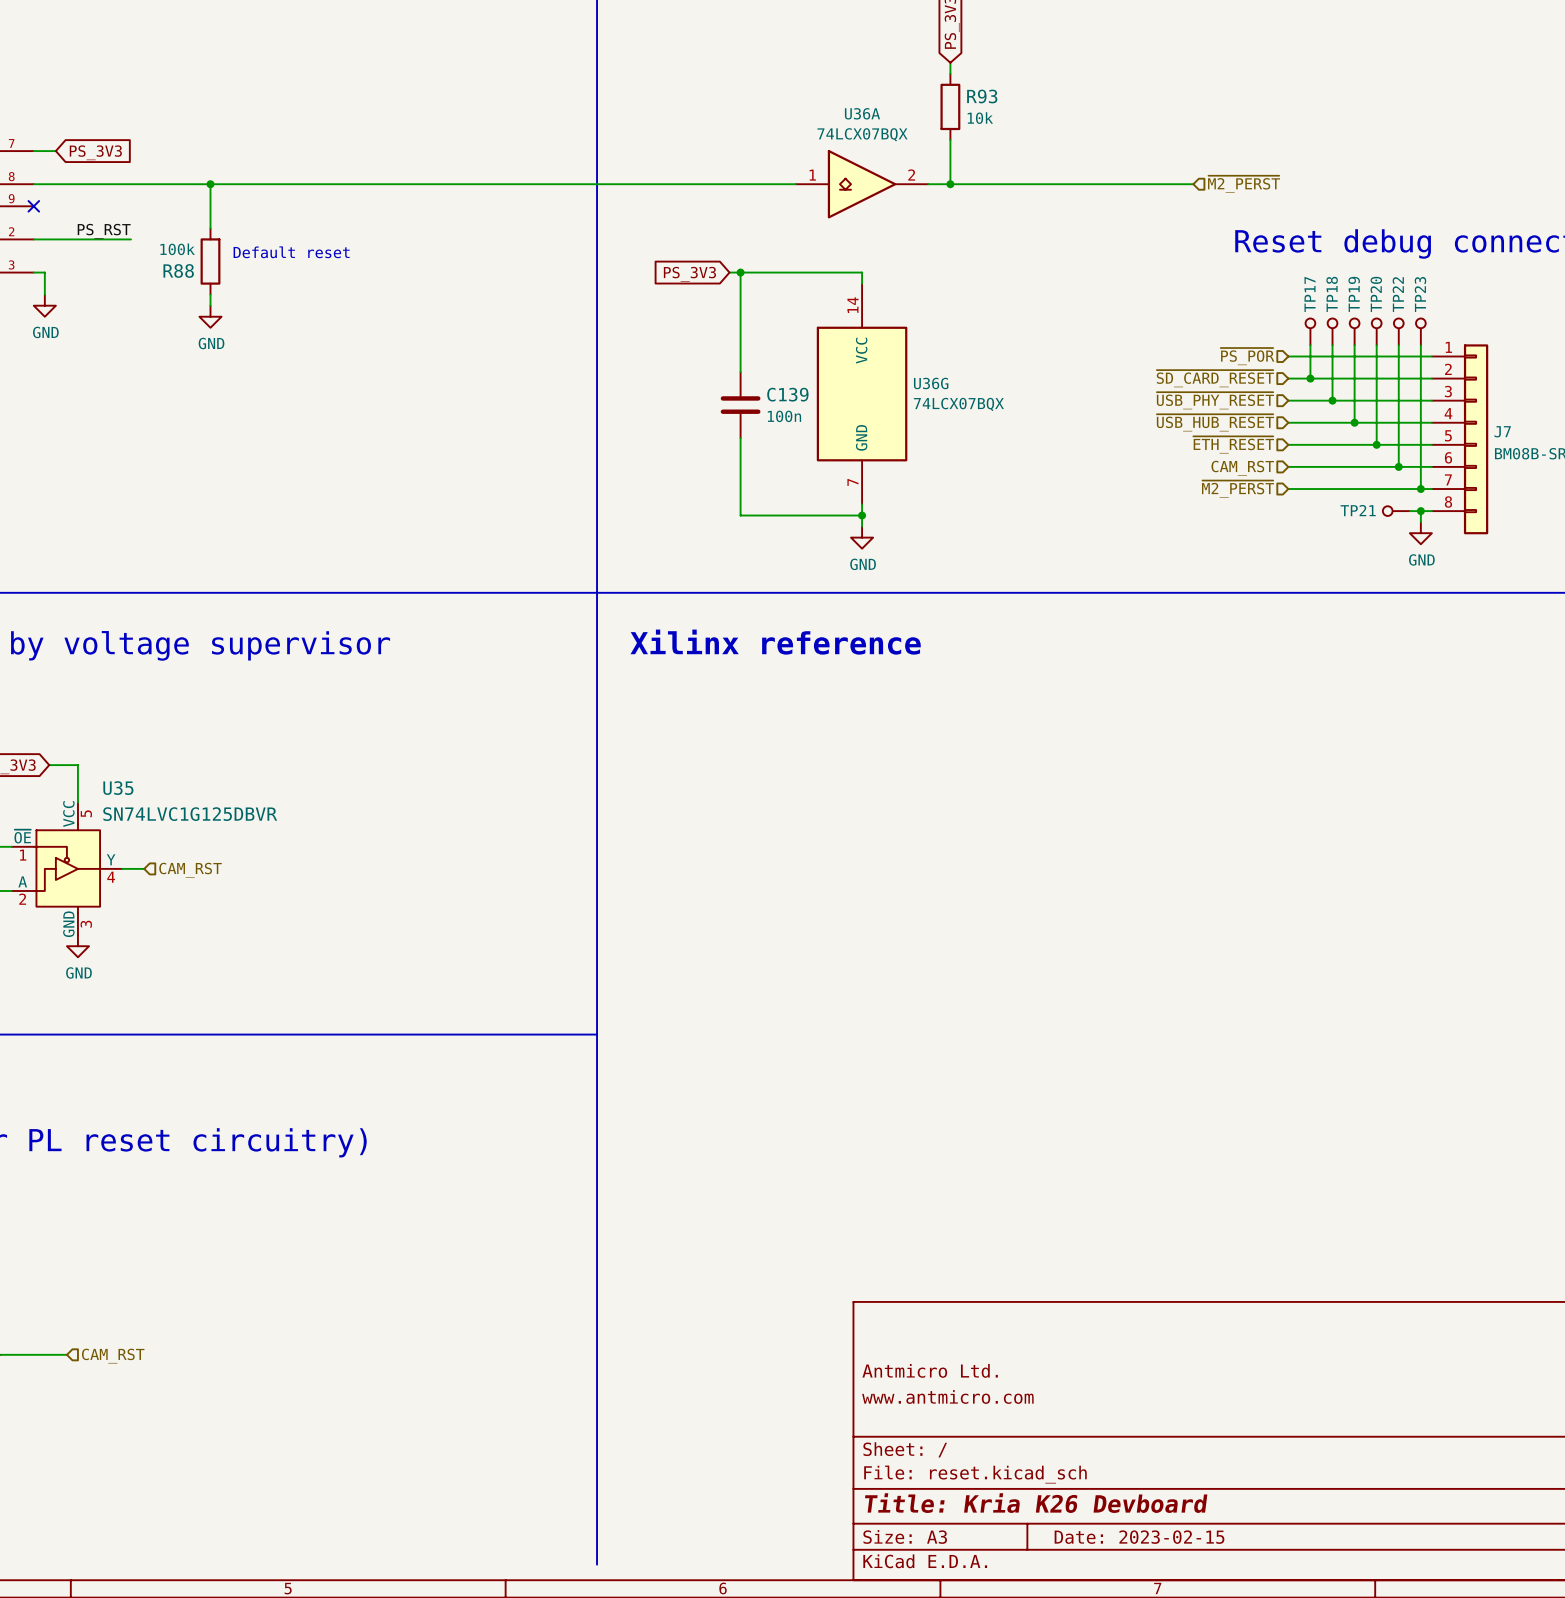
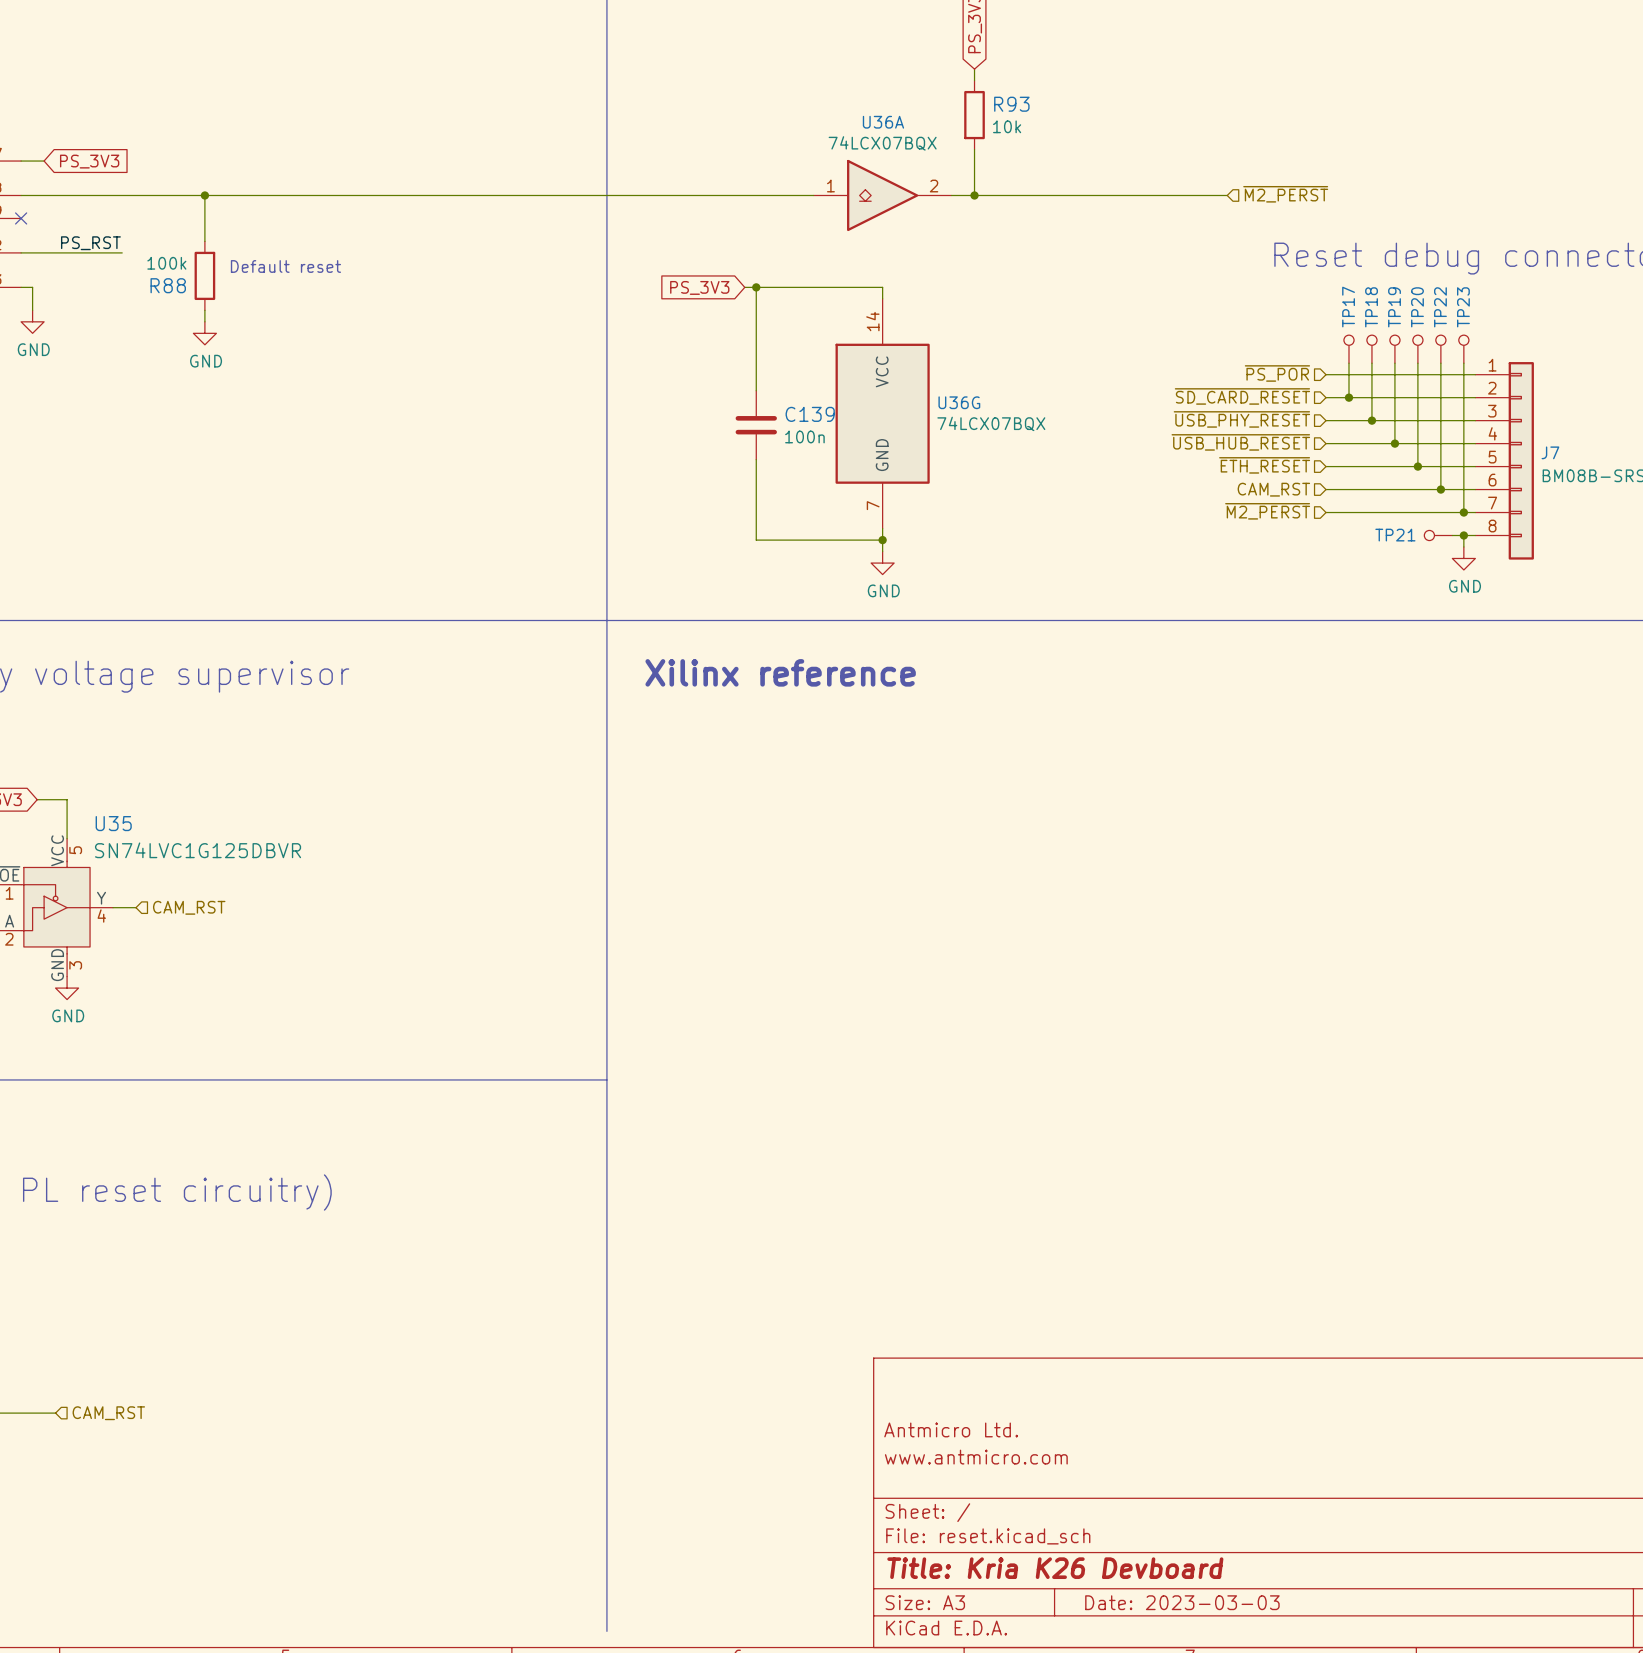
title block: Date: 2023-02-15 (1139, 1537) -> Date: 2023-03-03 (1182, 1602)

